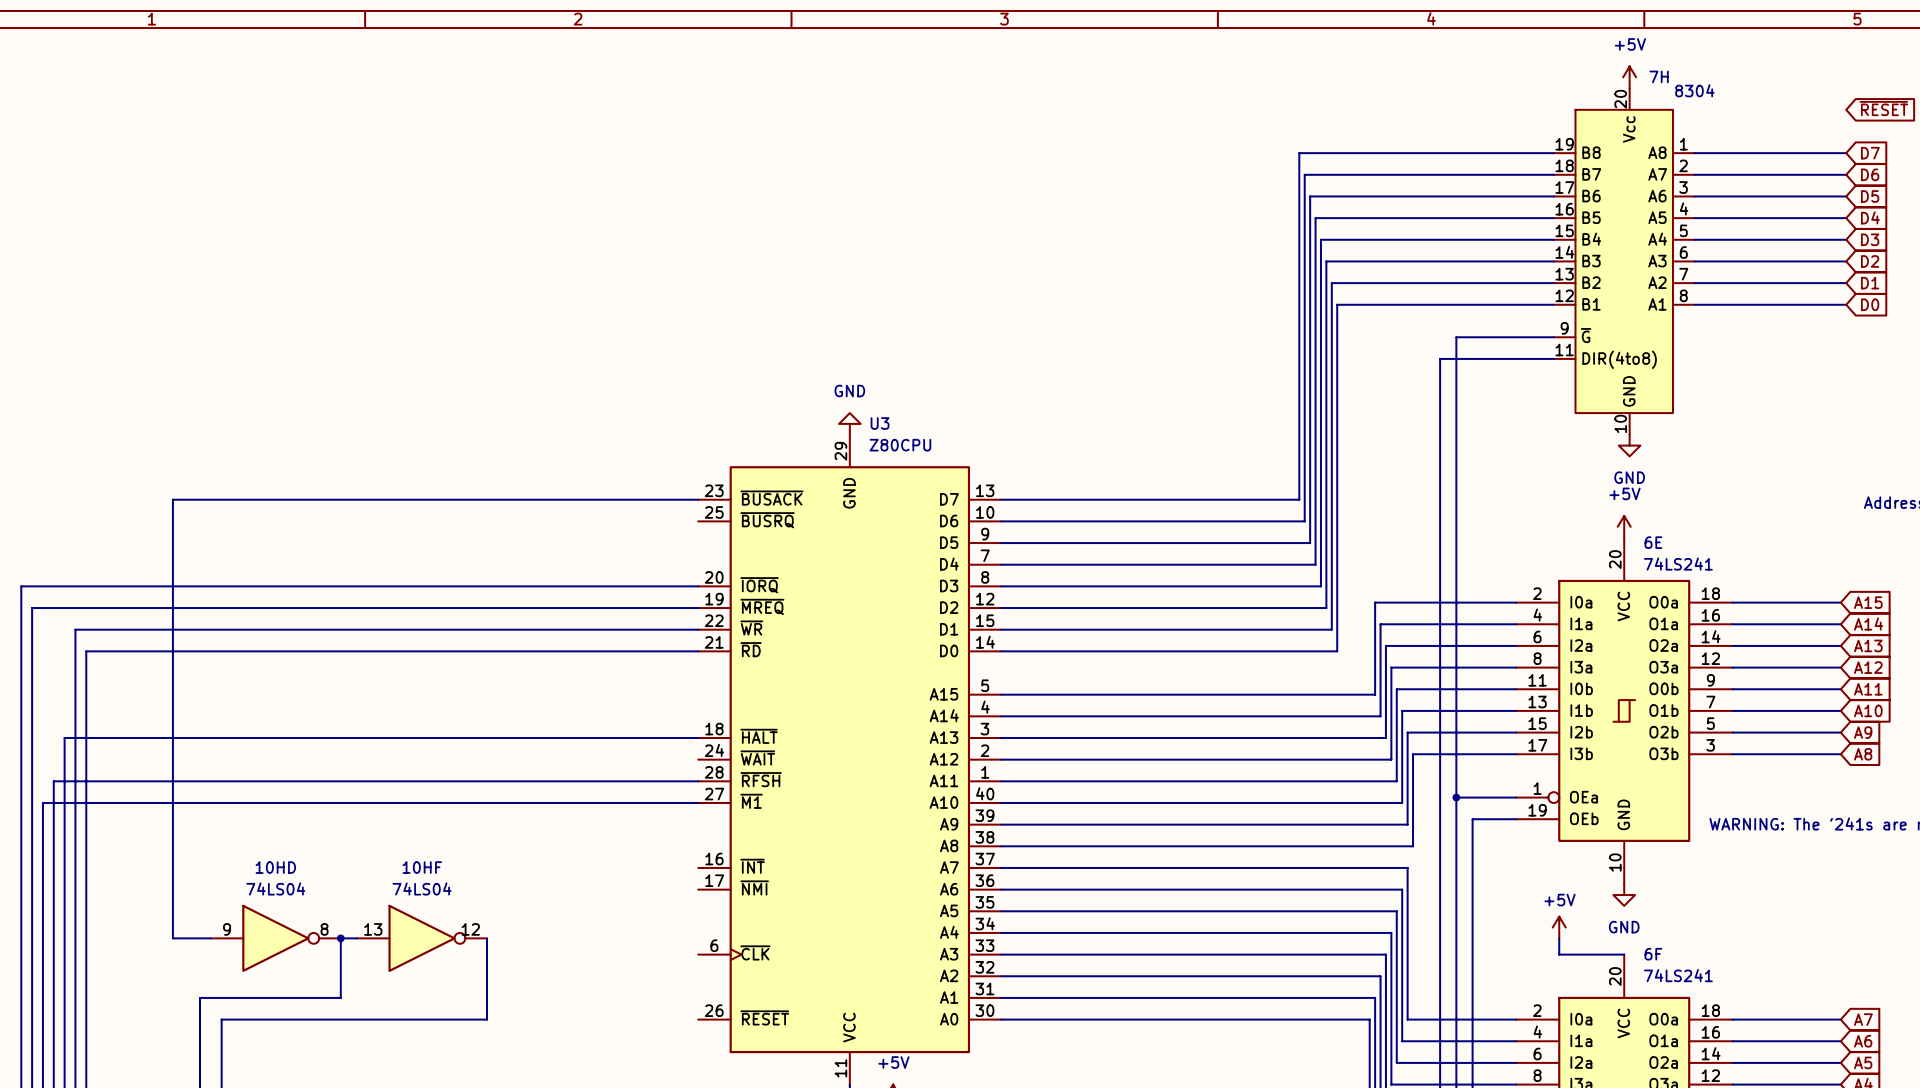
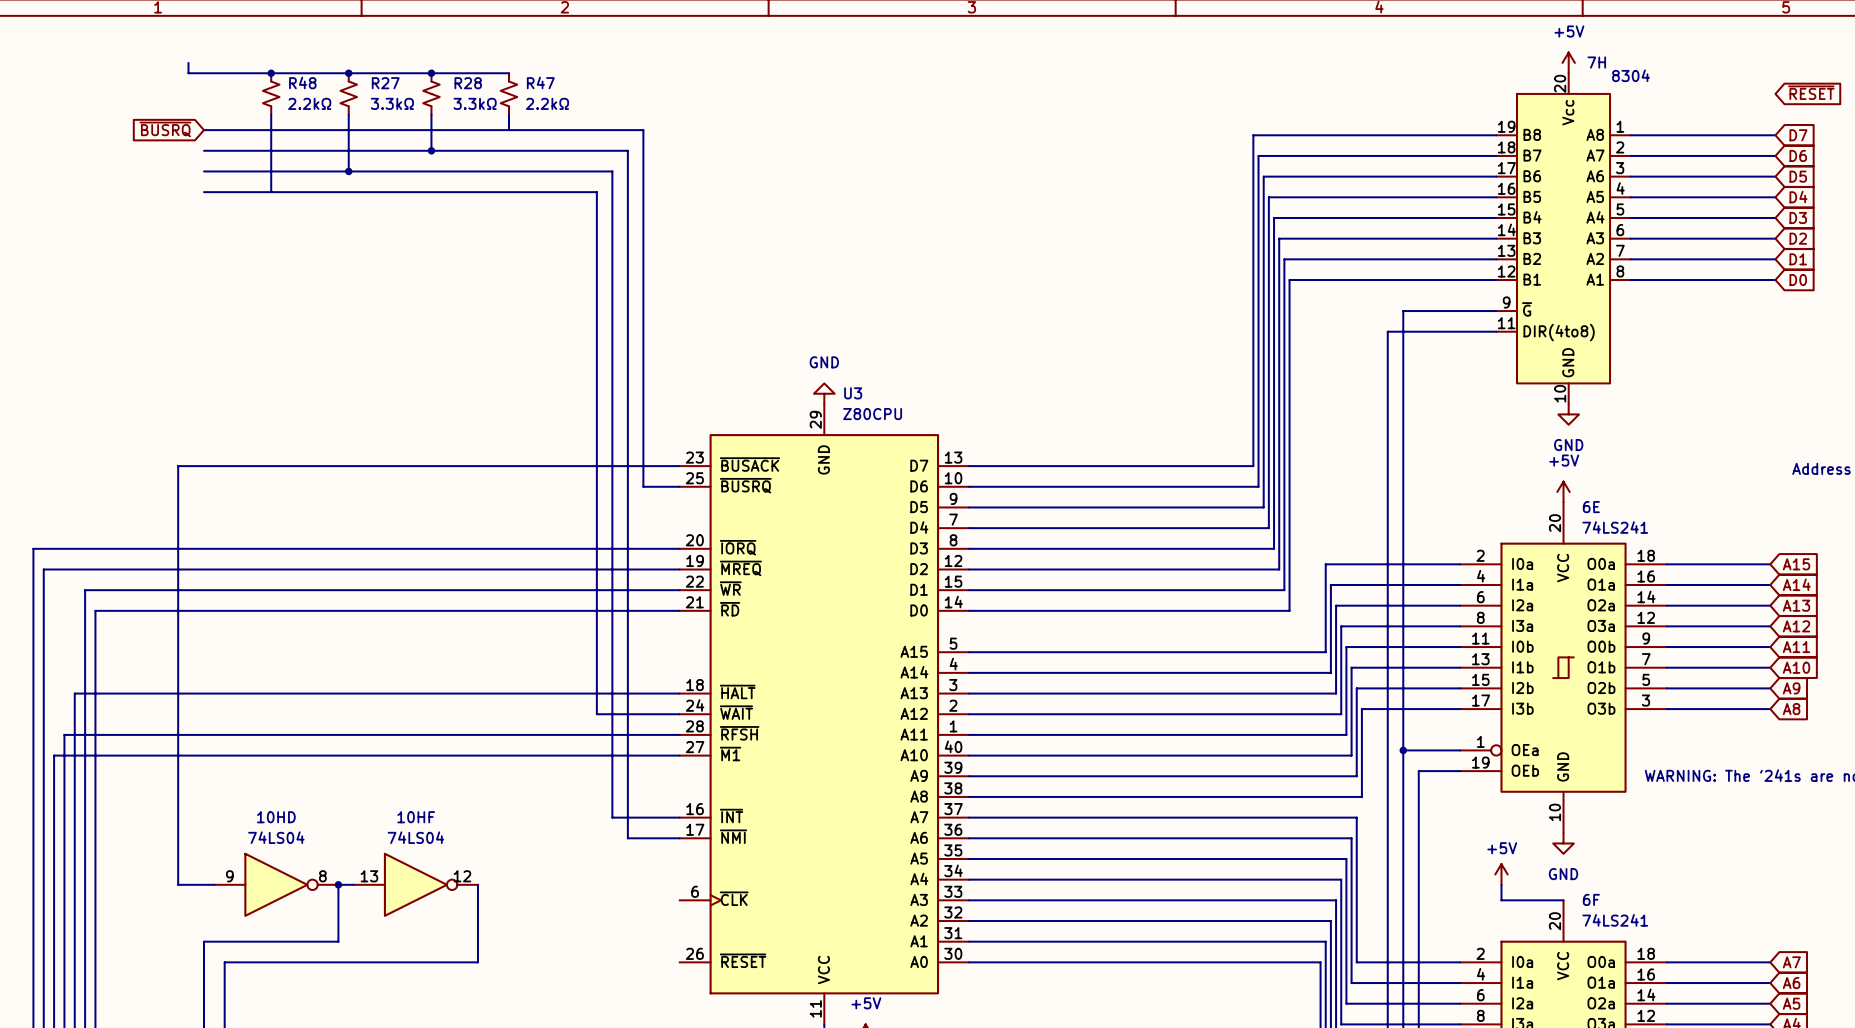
wire: none -> (188, 62) (188, 73) (508, 73)
junction: none -> (271, 73)
junction: none -> (348, 73)
junction: none -> (431, 73)
R48: none -> 2.2kΩ (271, 93)
R27: none -> 3.3kΩ (348, 93)
R28: none -> 3.3kΩ (431, 93)
R47: none -> 2.2kΩ (508, 93)
wire: none -> (271, 114) (271, 192)
wire: none -> (348, 114) (348, 171)
wire: none -> (431, 114) (431, 150)
wire: none -> (508, 114) (508, 130)
global label: none -> ~{BUSRQ} (165, 129)
wire: none -> (204, 130) (643, 130) (643, 486) (679, 486)
wire: none -> (204, 150) (627, 150) (627, 838) (679, 838)
junction: none -> (431, 150)
wire: none -> (204, 171) (612, 171) (612, 817) (679, 817)
junction: none -> (348, 171)
wire: none -> (204, 192) (596, 192) (596, 714) (679, 714)

